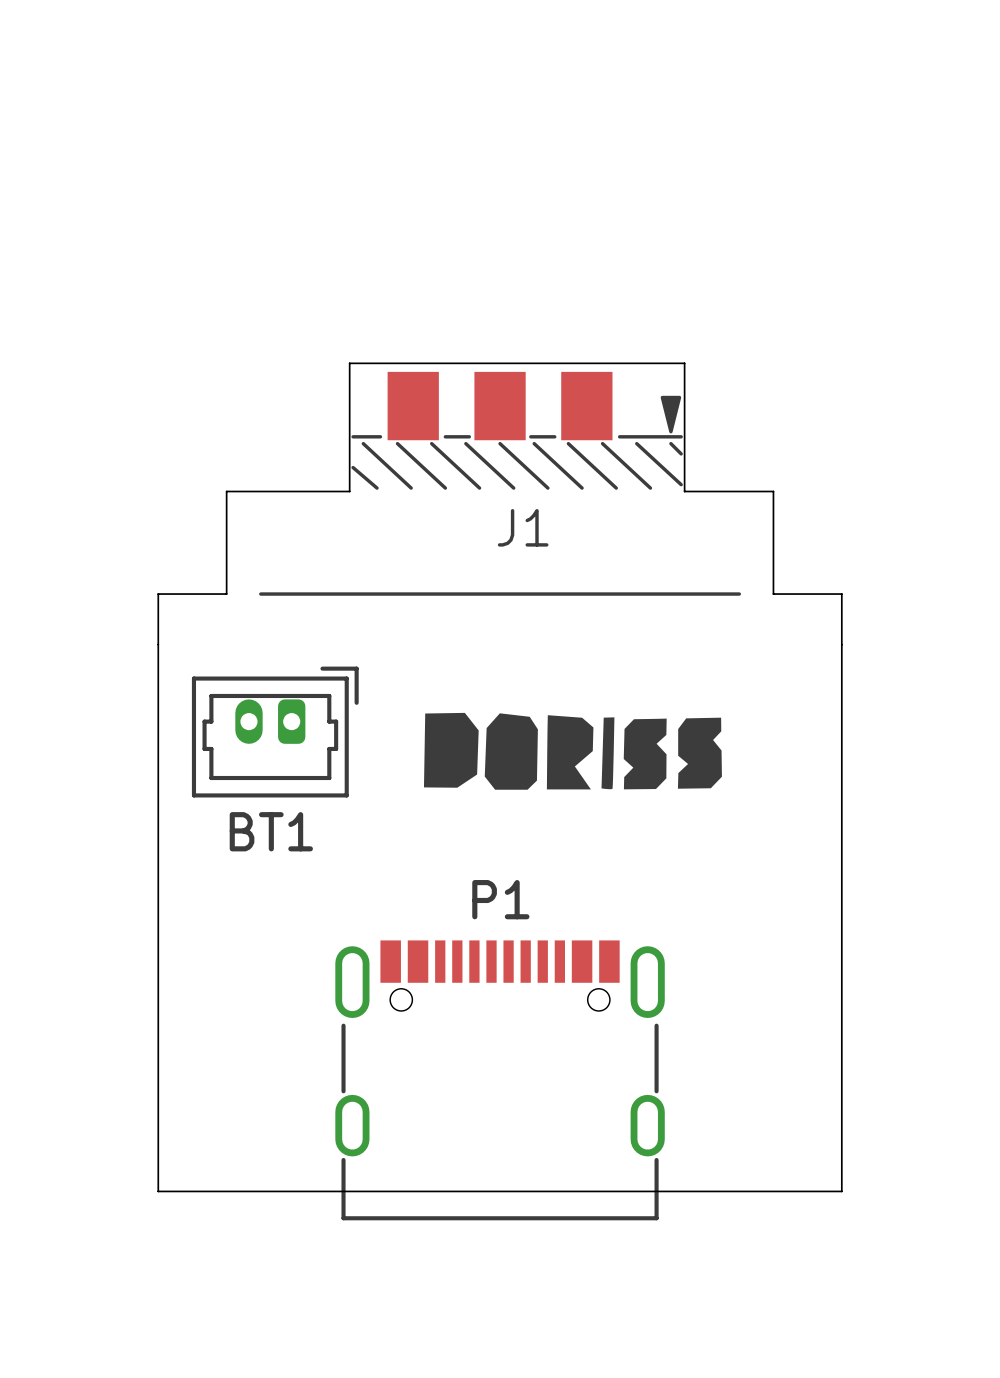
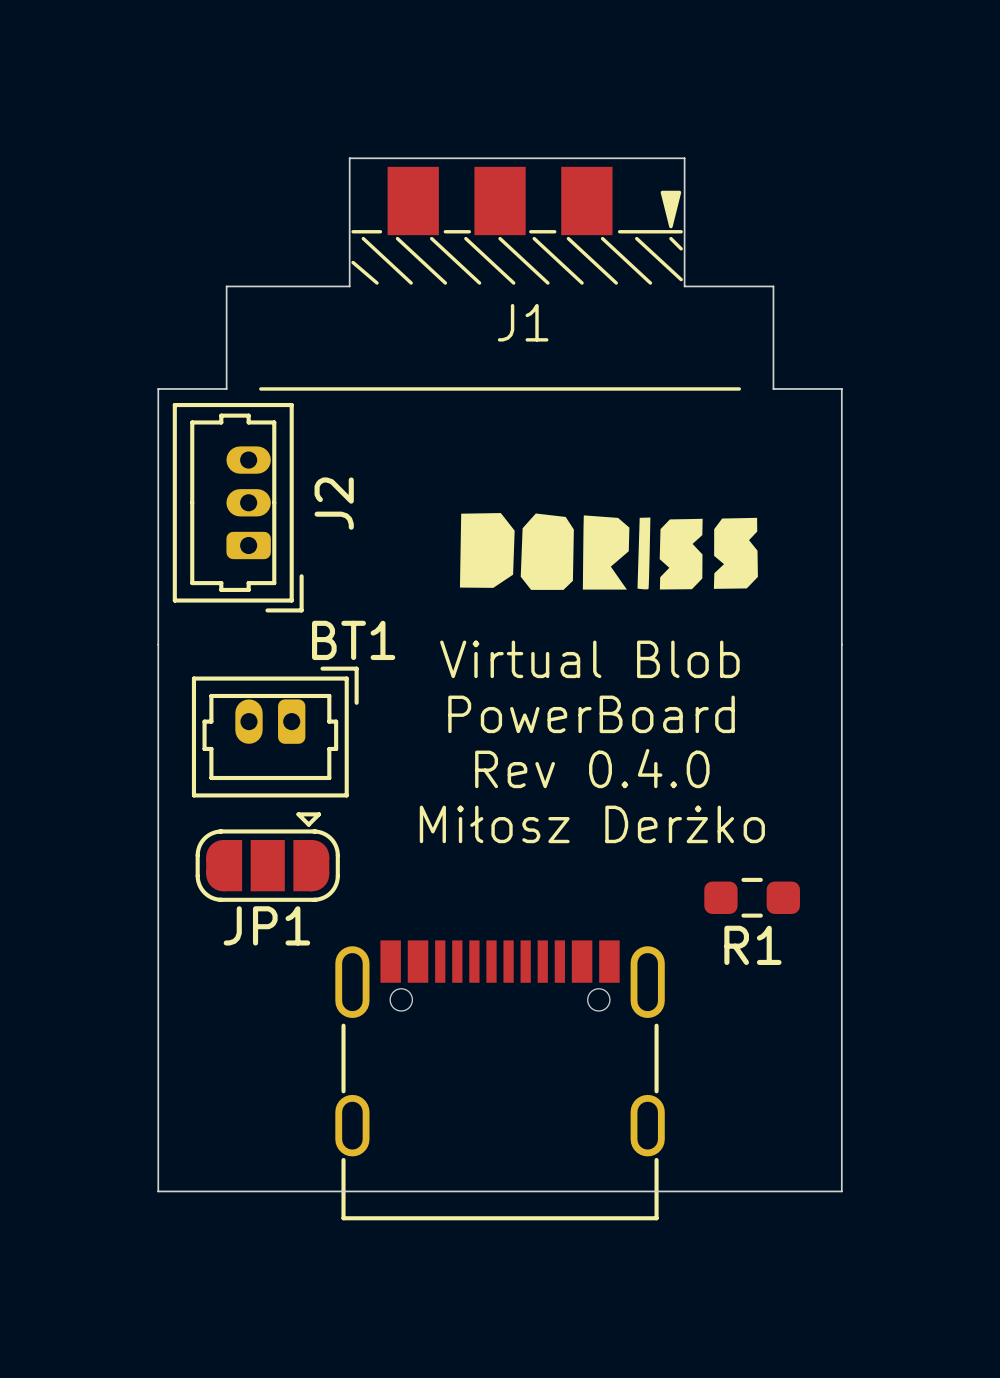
J1 position: (500, 427) -> (500, 222)
board edge: (226, 491) (226, 594) (158, 594) -> (226, 286) (226, 388) (158, 388) (158, 594)
board edge: (773, 491) (773, 594) (841, 594) -> (773, 286) (773, 388) (841, 388) (841, 594)
J2: none -> (238, 507)
line: (260, 594) (739, 594) -> (260, 388) (739, 388)
text: none -> Virtual Blob (589, 659)
text: none -> PowerBoard (591, 714)
drawing position: (451, 750) -> (487, 550)
drawing position: (511, 751) -> (547, 551)
drawing position: (570, 752) -> (606, 552)
drawing position: (607, 753) -> (643, 553)
drawing position: (645, 753) -> (681, 554)
drawing position: (699, 753) -> (735, 553)
text: none -> Rev 0.4.0 (592, 768)
text: none -> Miłosz Derżko (592, 824)
BT1 name position: BT1 (271, 831) -> BT1 (353, 640)
JP1: none -> (267, 857)
R1: none -> (752, 897)
P1 name: P1 (500, 899) -> none

